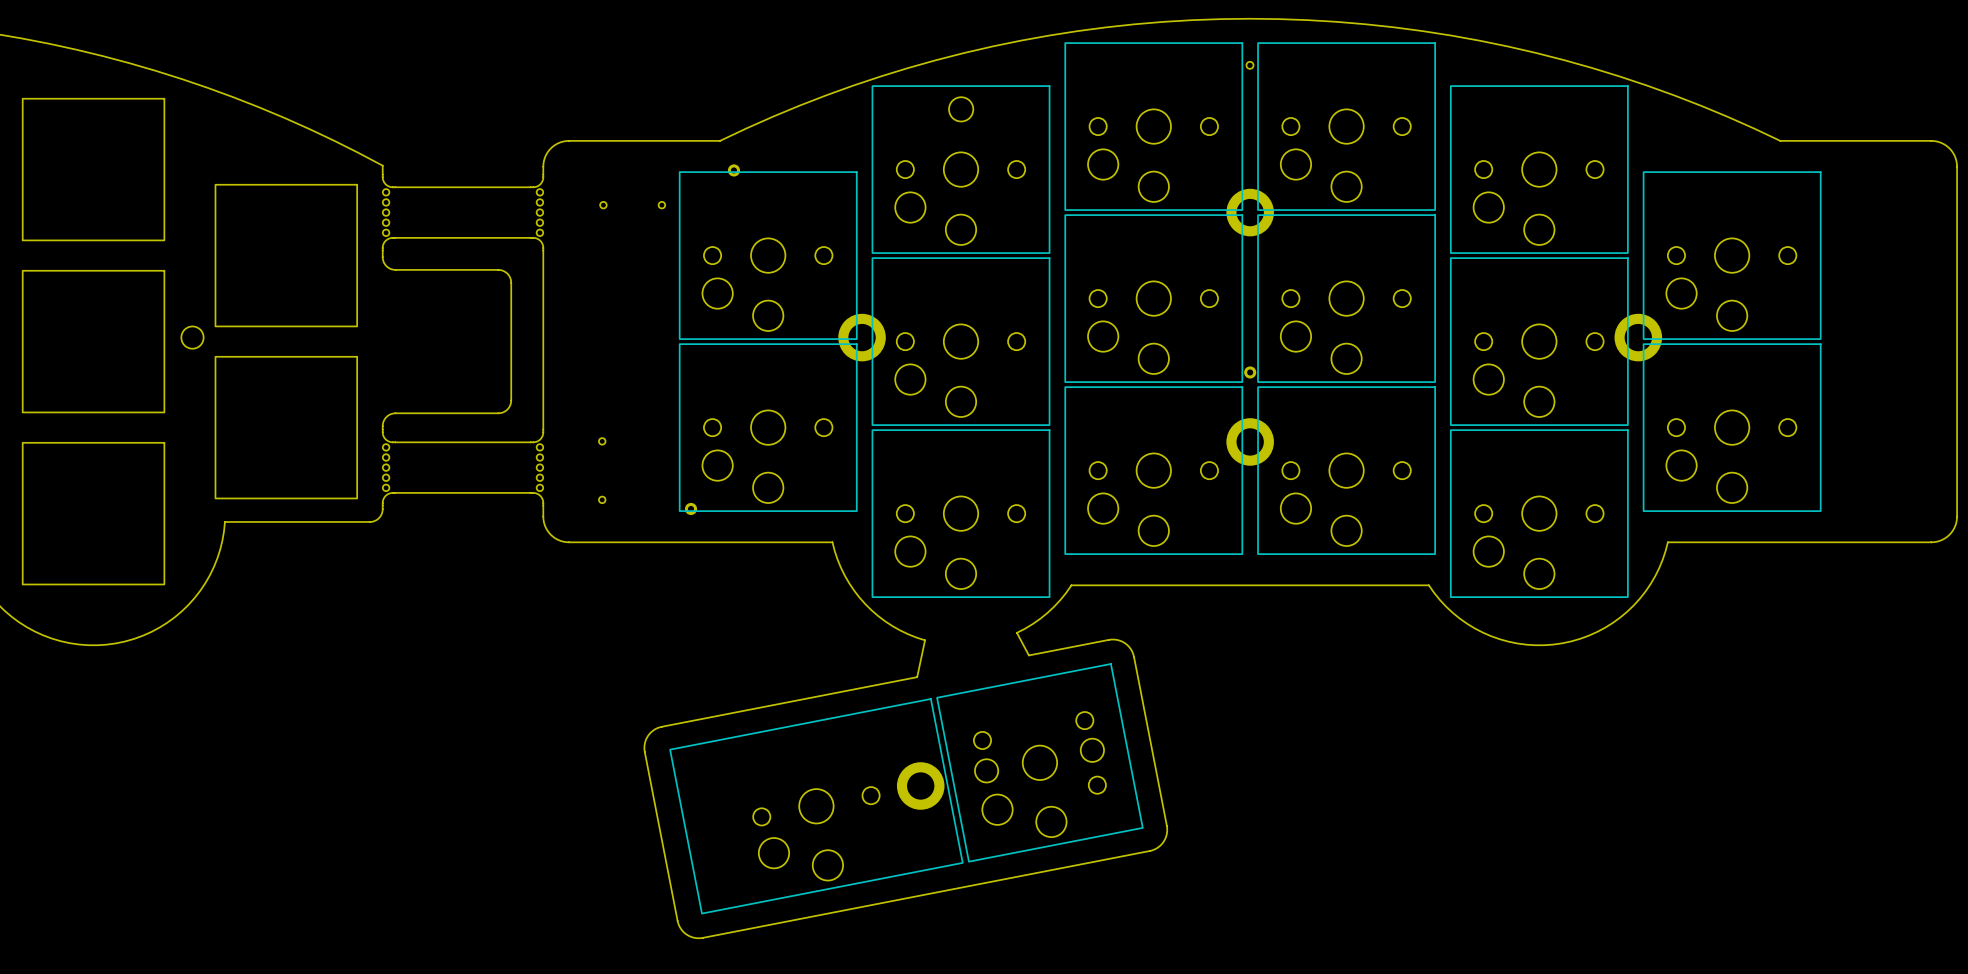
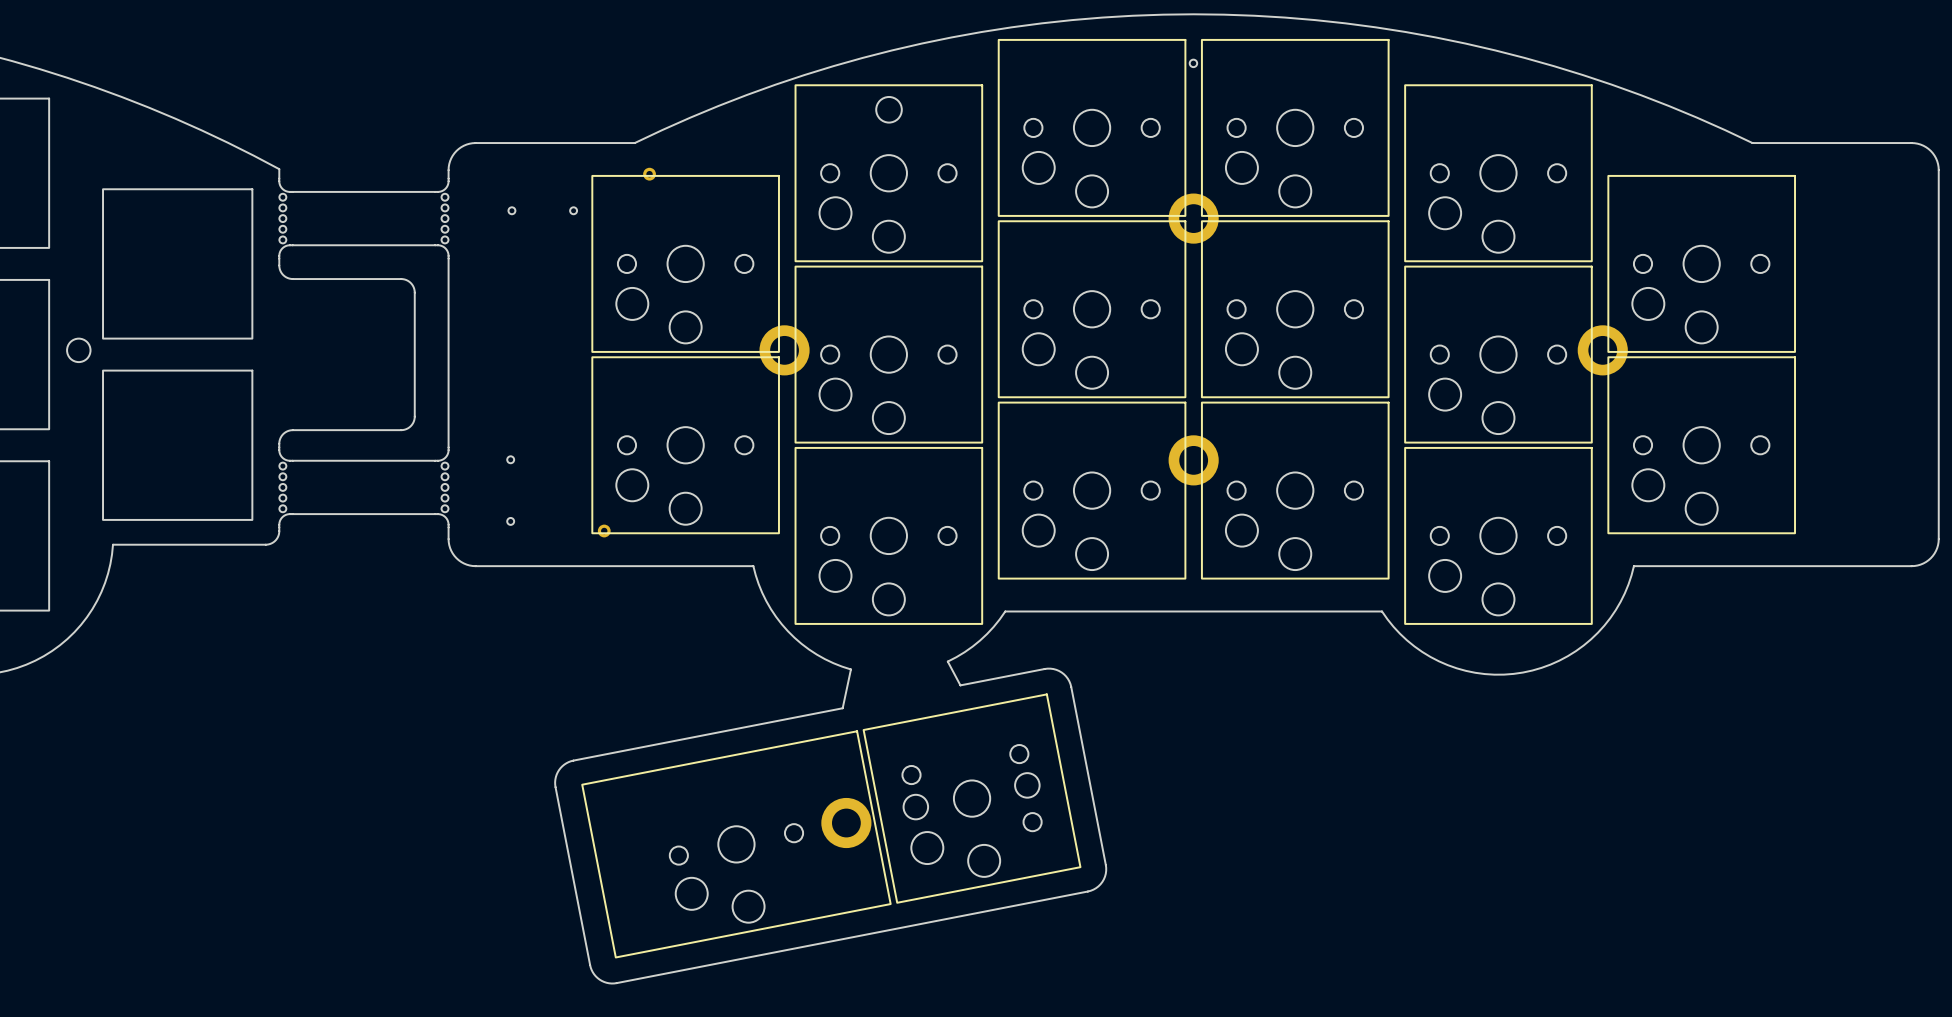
part: (1250, 372) -> none

